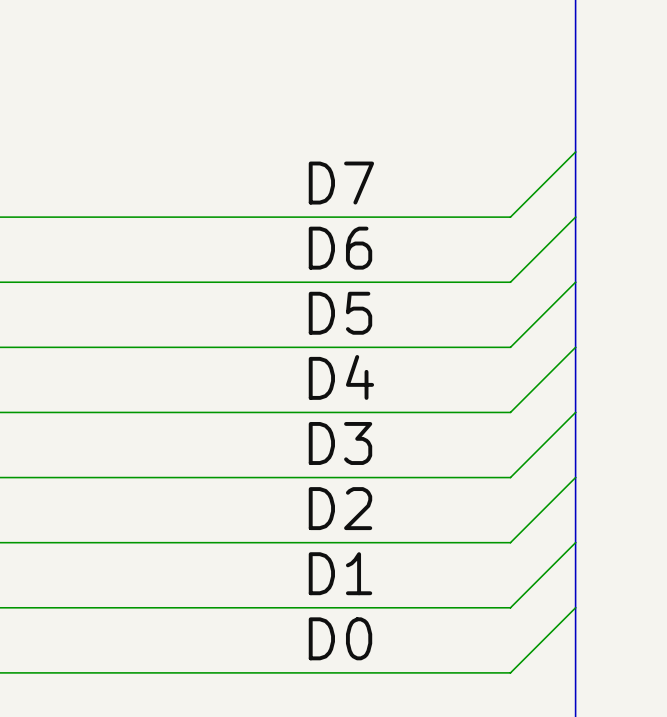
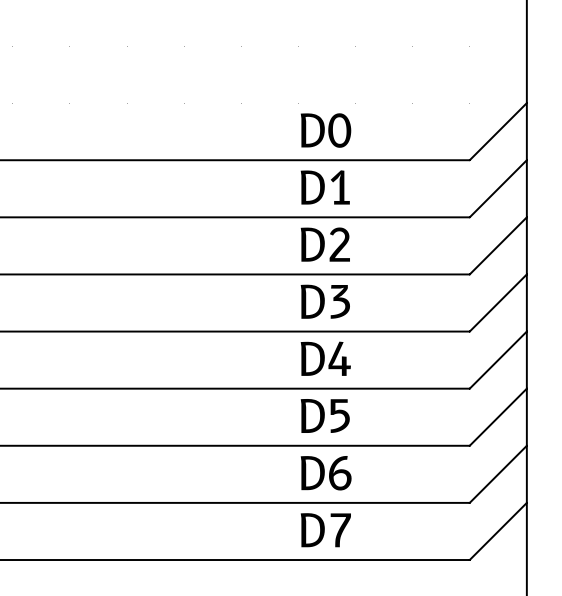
label: D7 (341, 183) -> D0 (325, 130)
label: D6 (340, 248) -> D1 (325, 187)
label: D5 (340, 313) -> D2 (325, 244)
label: D4 (341, 377) -> D3 (325, 301)
label: D3 (340, 443) -> D4 (325, 358)
label: D2 (340, 508) -> D5 (325, 415)
label: D1 (340, 573) -> D6 (326, 473)
label: D0 (340, 638) -> D7 (325, 530)

